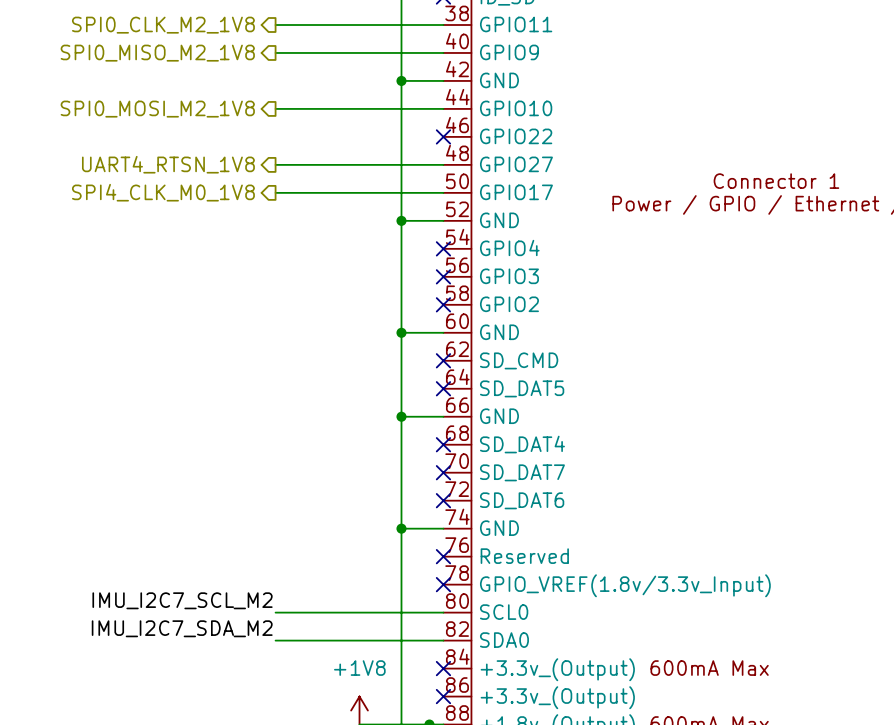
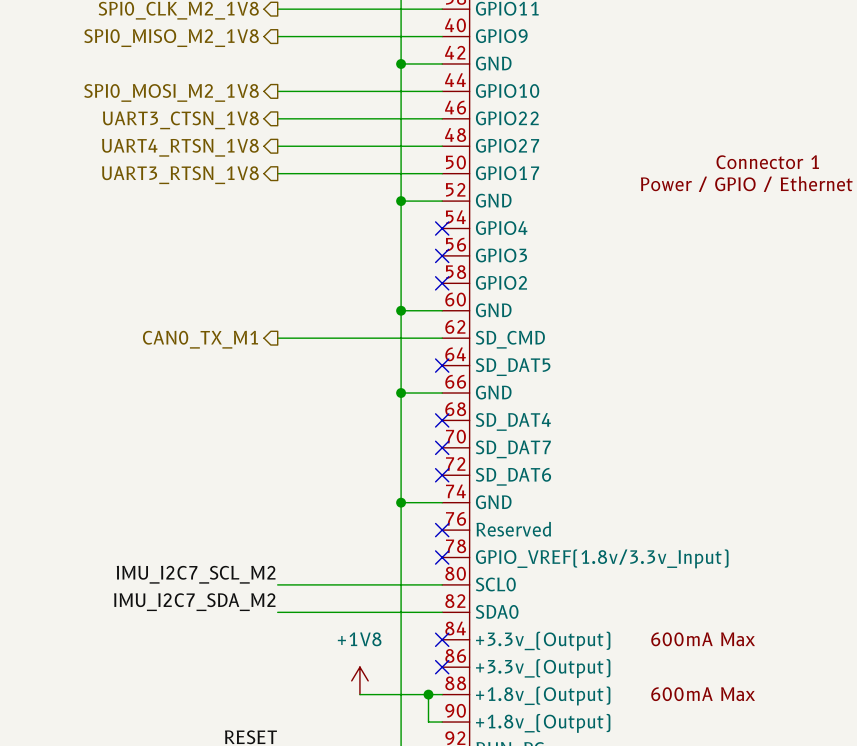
wire: none -> (277, 118) (442, 118)
no-connect mark: (443, 136) -> none
hierarchical label: none -> UART3_CTSN_1V8 (180, 120)
hierarchical label: SPI4_CLK_M0_1V8 (163, 192) -> UART3_RTSN_1V8 (180, 175)
hierarchical label: none -> CAN0_TX_M1 (200, 339)
wire: none -> (277, 338) (442, 338)
no-connect mark: (443, 360) -> none

